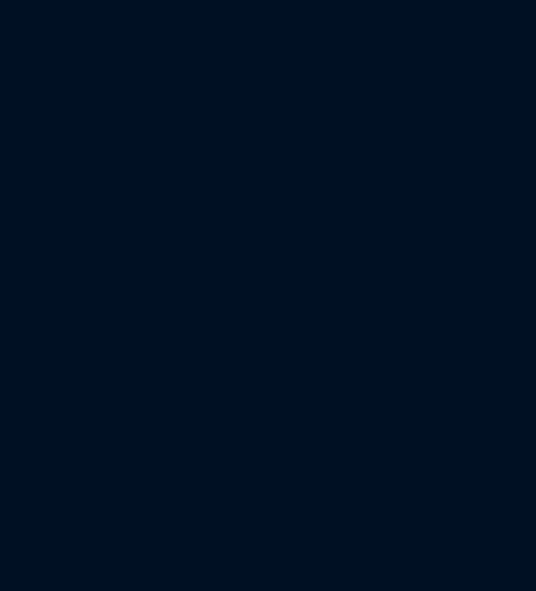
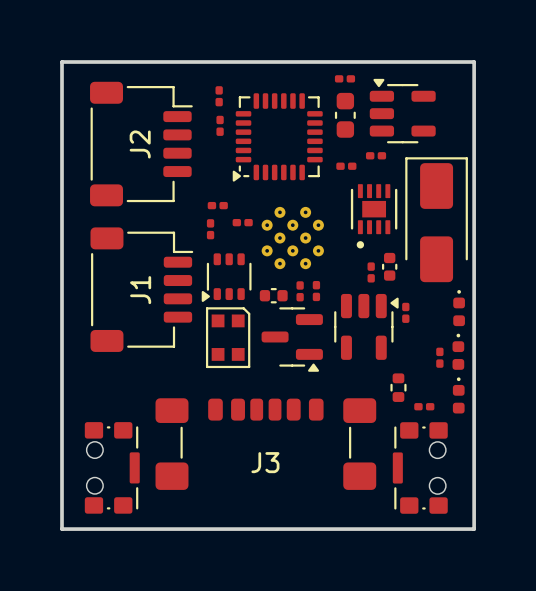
board edge: none -> (62, 62) (474, 62) (474, 529) (62, 529) (62, 62)
part: none -> (344, 78)
part: none -> (219, 96)
part: none -> (402, 111)
part: none -> (345, 115)
part: none -> (220, 125)
part: none -> (277, 137)
J2: none -> (141, 144)
part: none -> (376, 155)
part: none -> (346, 166)
part: none -> (217, 205)
part: none -> (374, 216)
part: none -> (436, 219)
part: none -> (242, 222)
part: none -> (210, 229)
part: none -> (292, 238)
part: none -> (389, 266)
part: none -> (371, 272)
part: none -> (226, 277)
J1: none -> (141, 289)
part: none -> (300, 291)
part: none -> (316, 291)
part: none -> (273, 295)
part: none -> (459, 308)
part: none -> (405, 312)
part: none -> (366, 326)
part: none -> (228, 337)
part: none -> (292, 339)
part: none -> (458, 351)
part: none -> (439, 357)
part: none -> (398, 387)
part: none -> (458, 395)
part: none -> (424, 406)
J3: none -> (265, 444)
part: none -> (112, 467)
part: none -> (420, 467)

